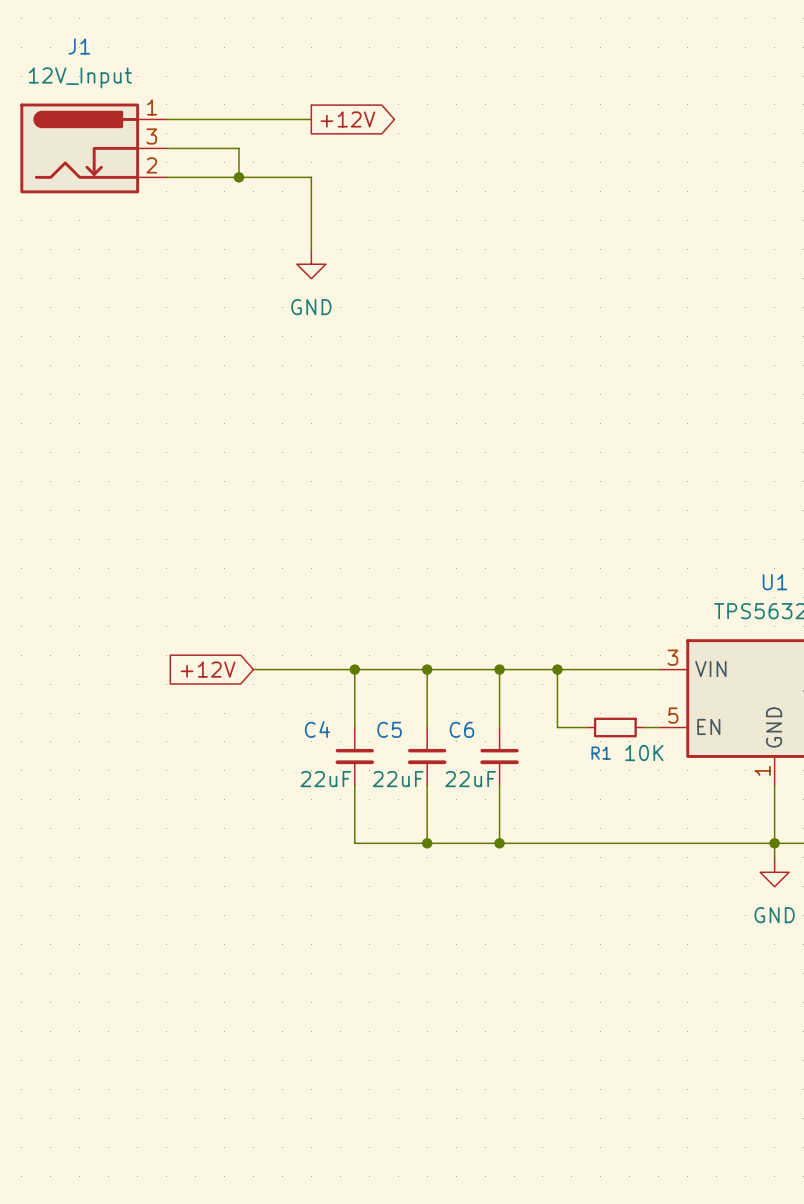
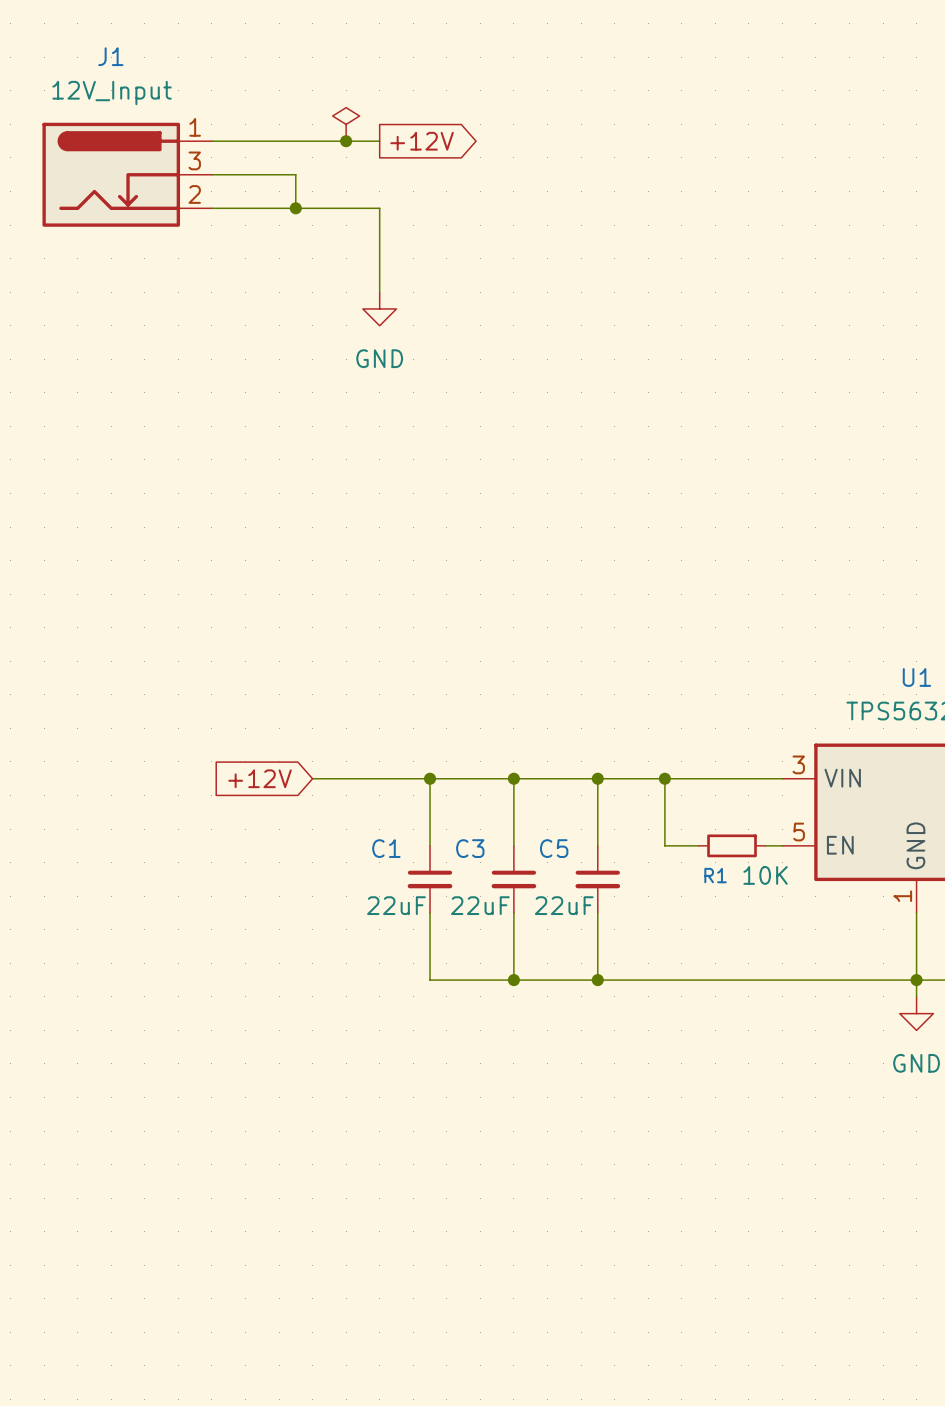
power symbol: none -> (346, 124)
junction: none -> (346, 141)
C4 name: C4 (317, 729) -> C1 (386, 848)
C5 name: C5 (389, 729) -> C3 (470, 848)
C6 name: C6 (461, 729) -> C5 (554, 848)

